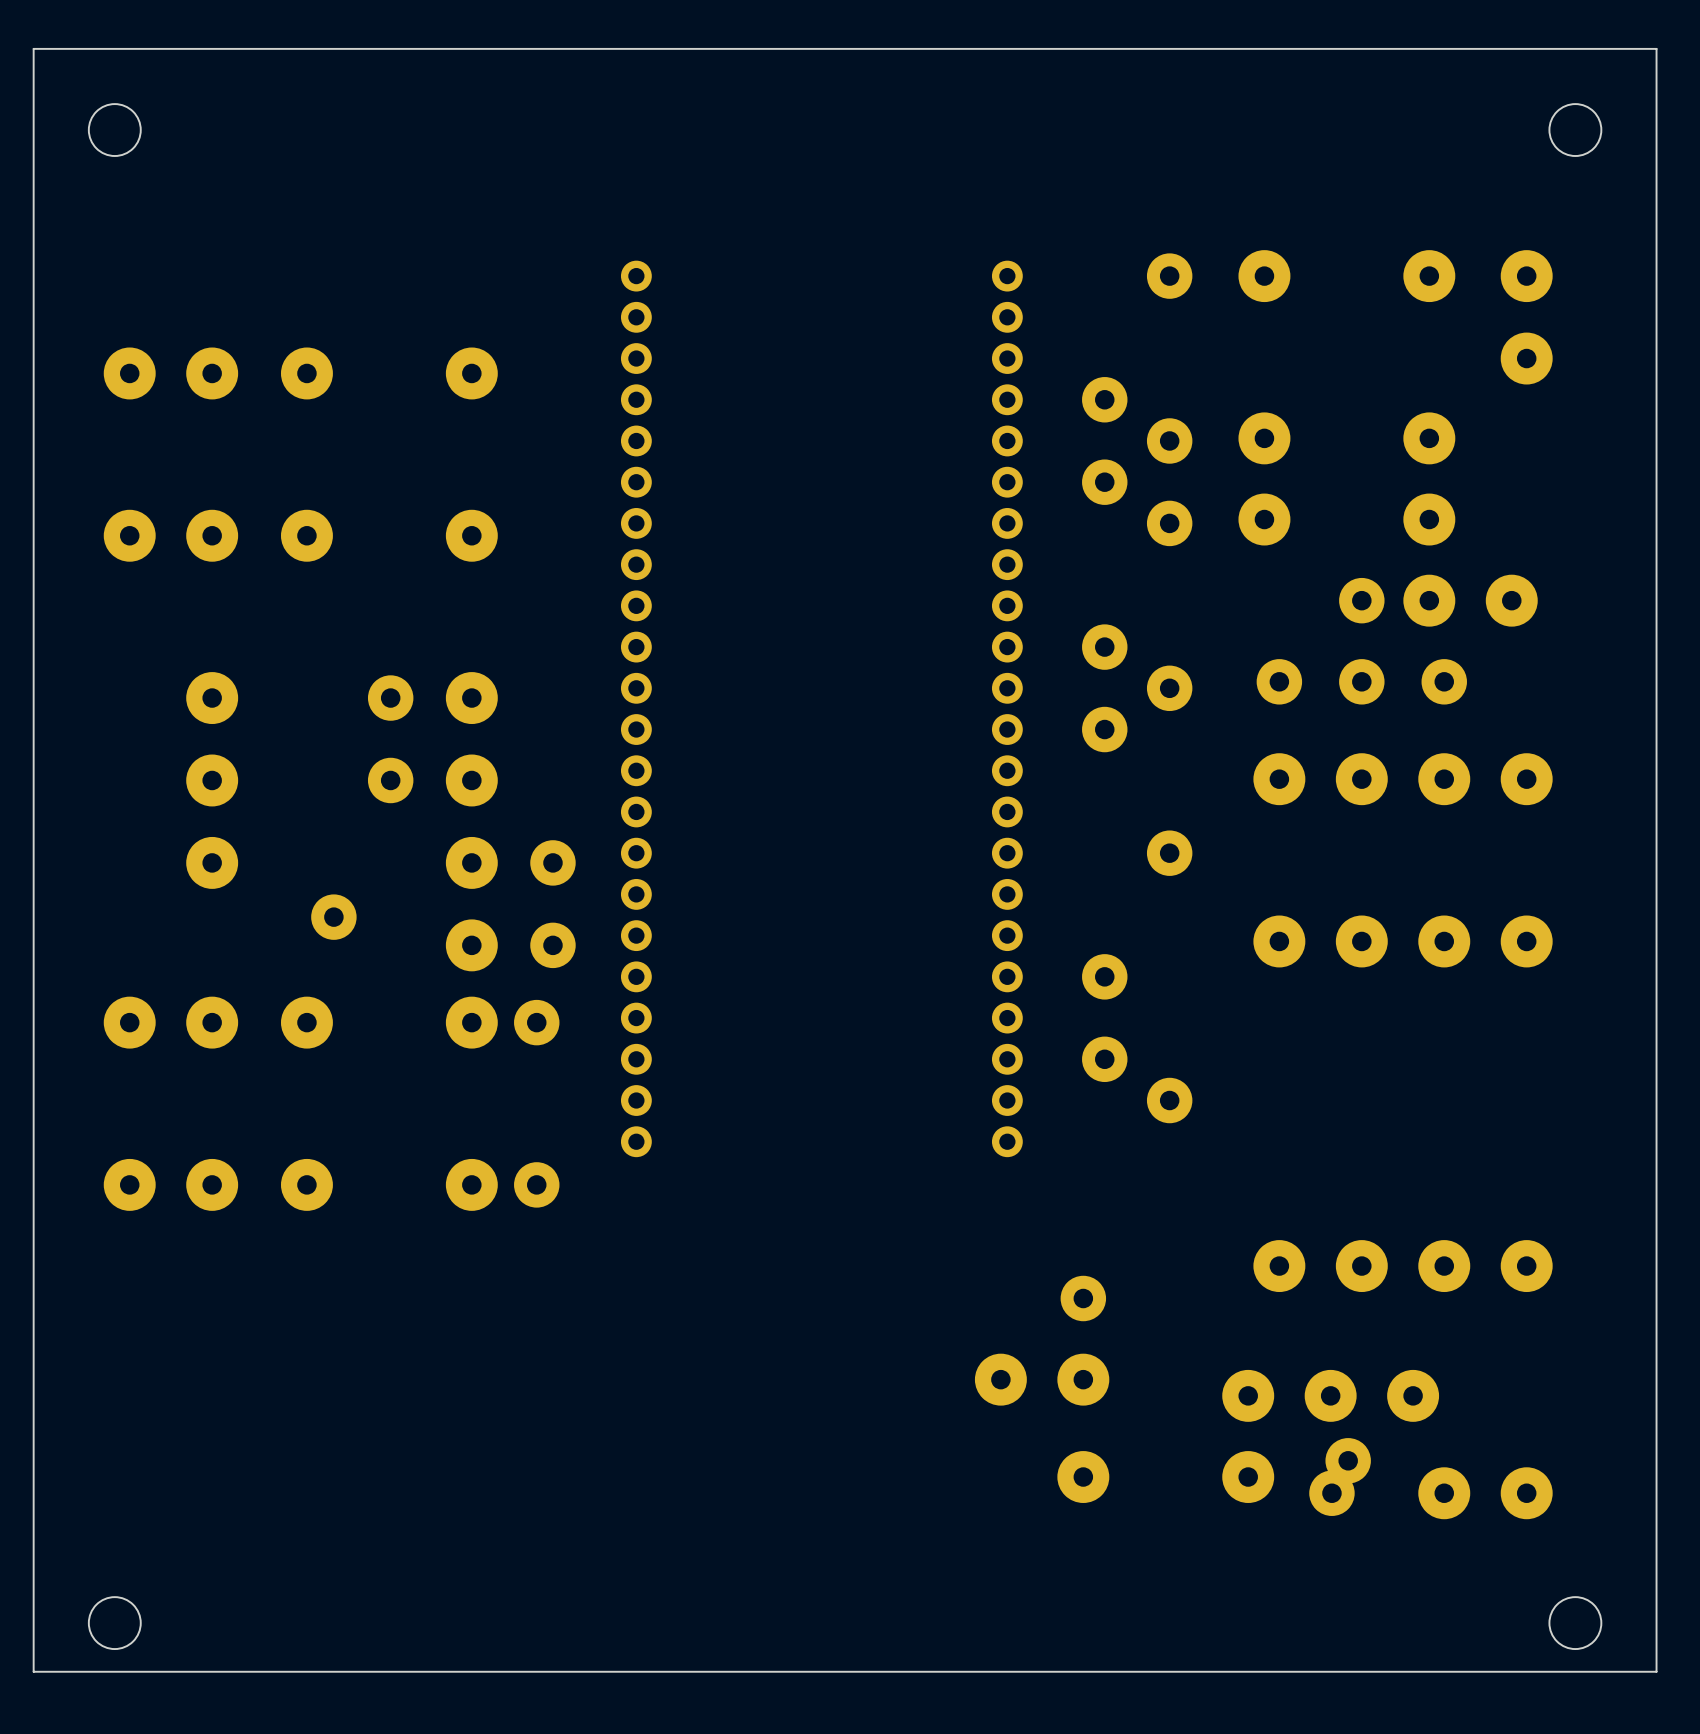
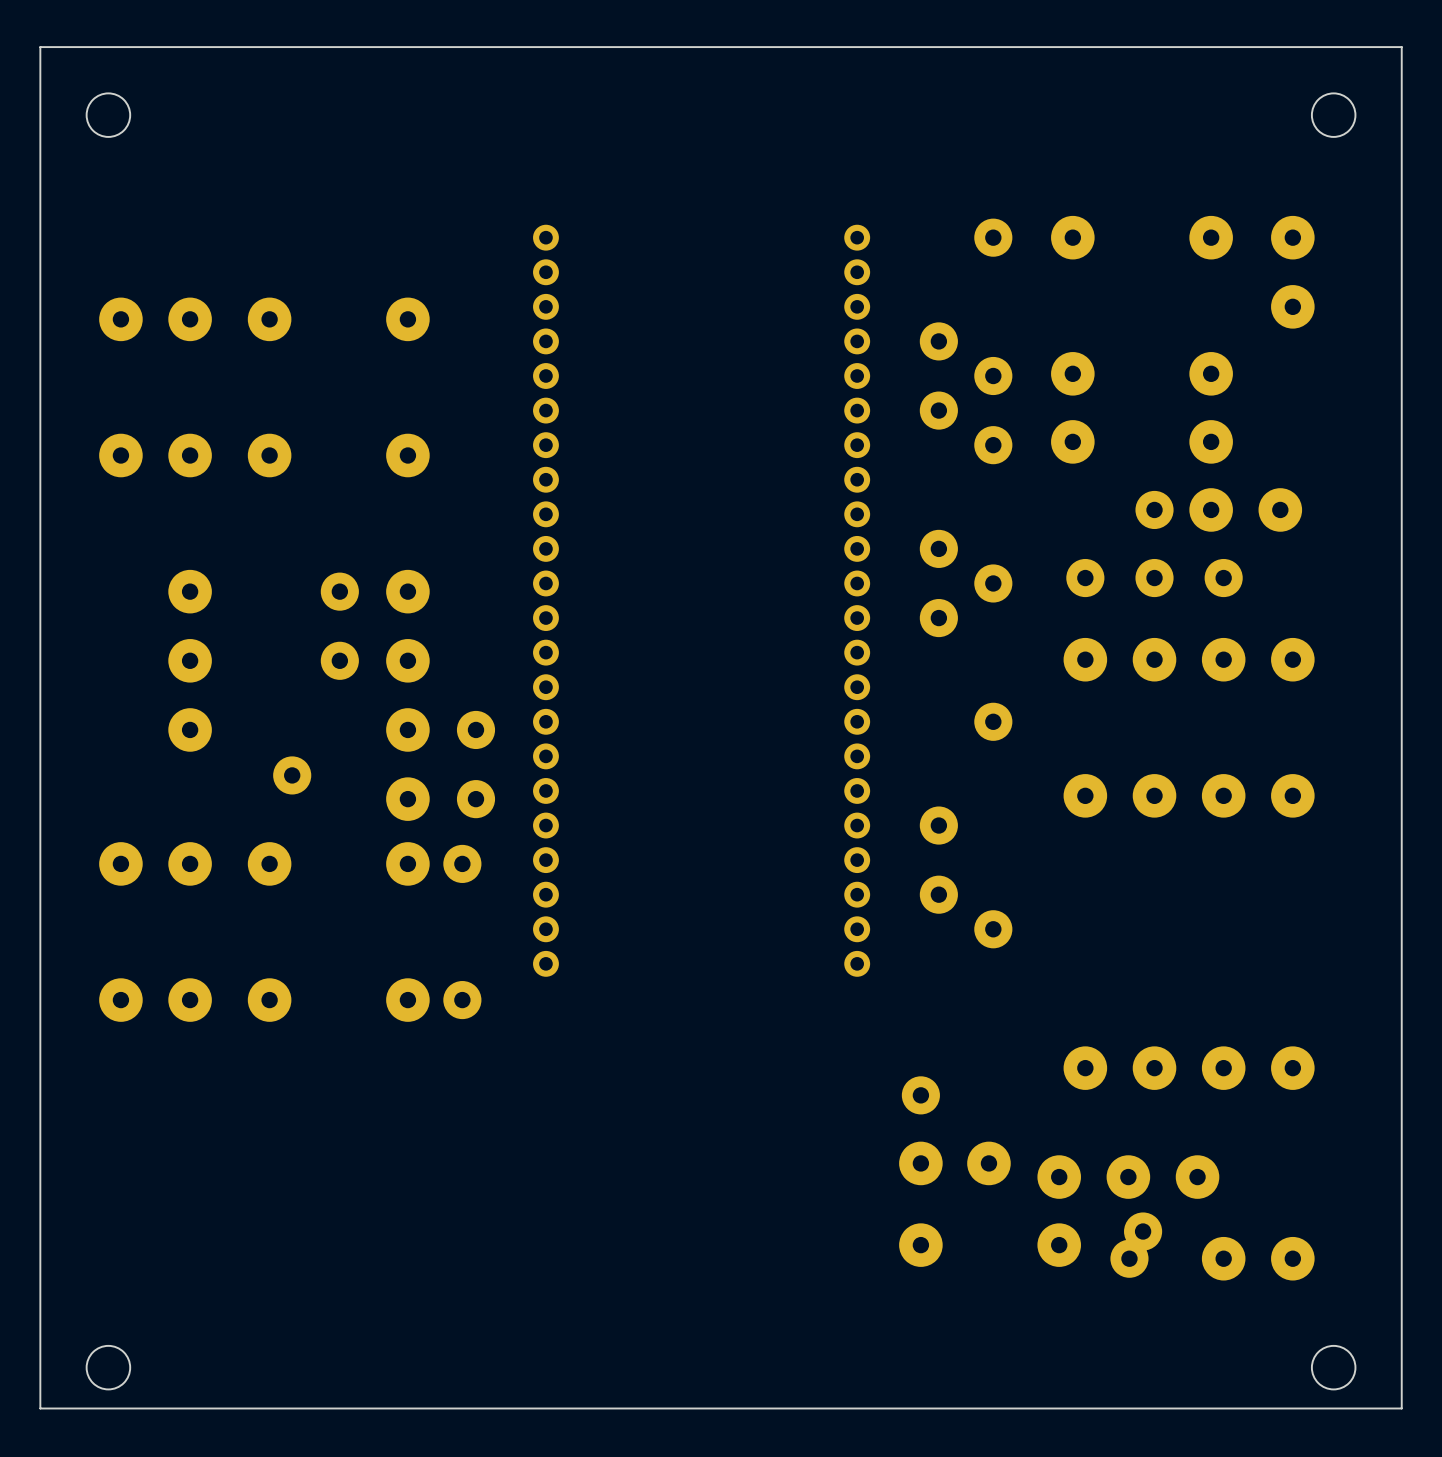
part: (1042, 1379) -> none
part: none -> (954, 1163)

